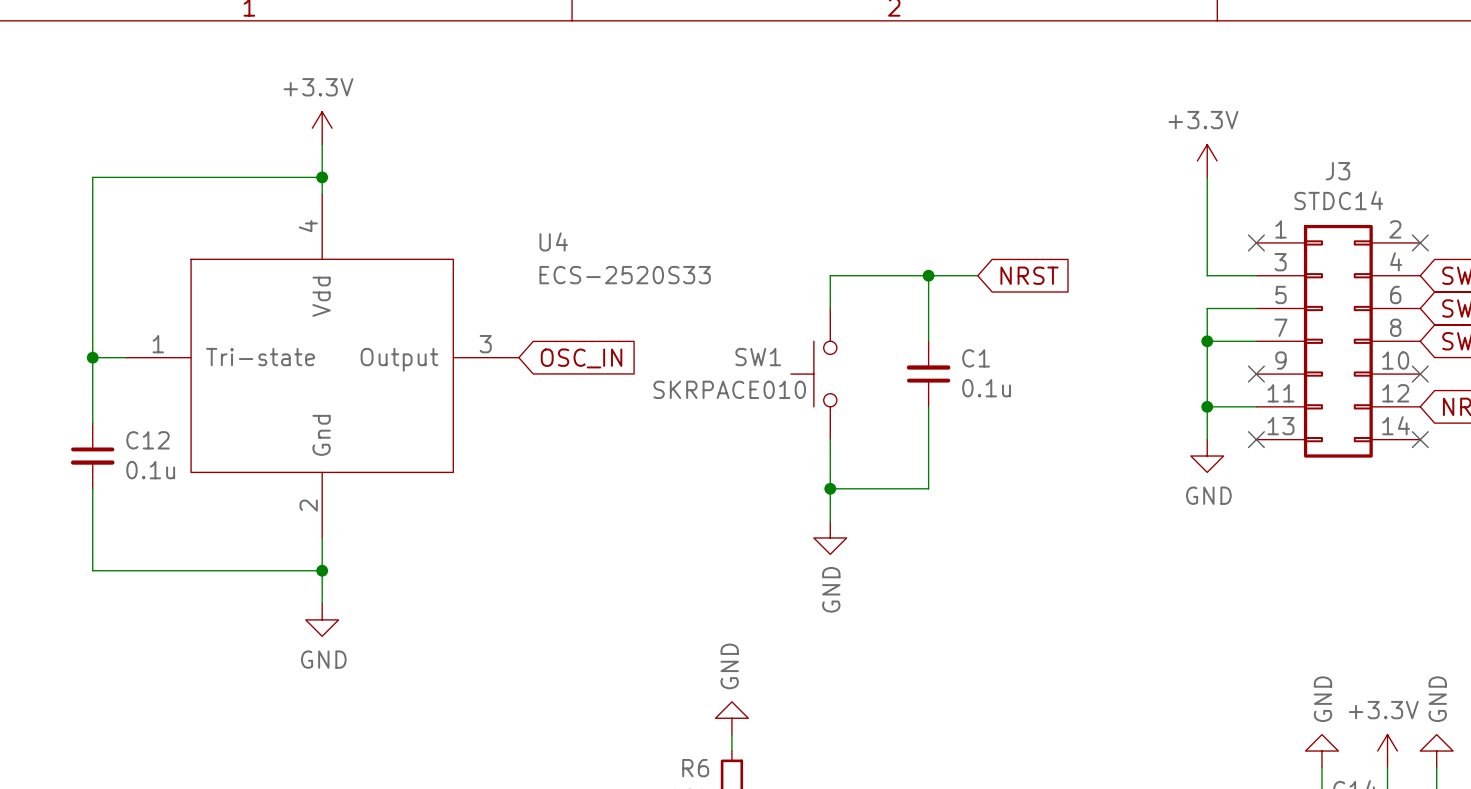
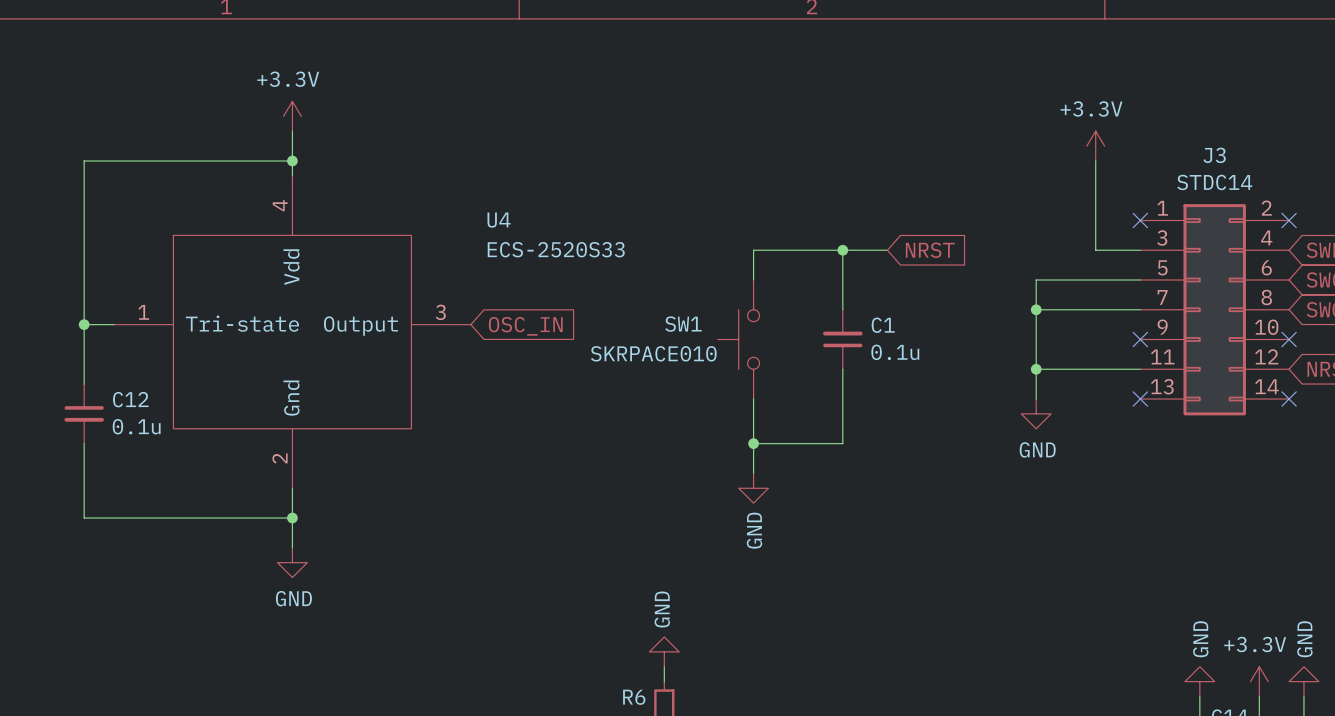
wire: (1207, 308) (1207, 439) -> (1095, 280) (1036, 280) (1036, 399)
wire: none -> (1036, 309) (1095, 309)
junction: none -> (1036, 309)
junction: (1207, 341) -> none
wire: none -> (1036, 369) (1095, 369)
junction: none -> (1036, 369)
junction: (1207, 406) -> none
power symbol position: GND (1207, 456) -> GND (1036, 413)

